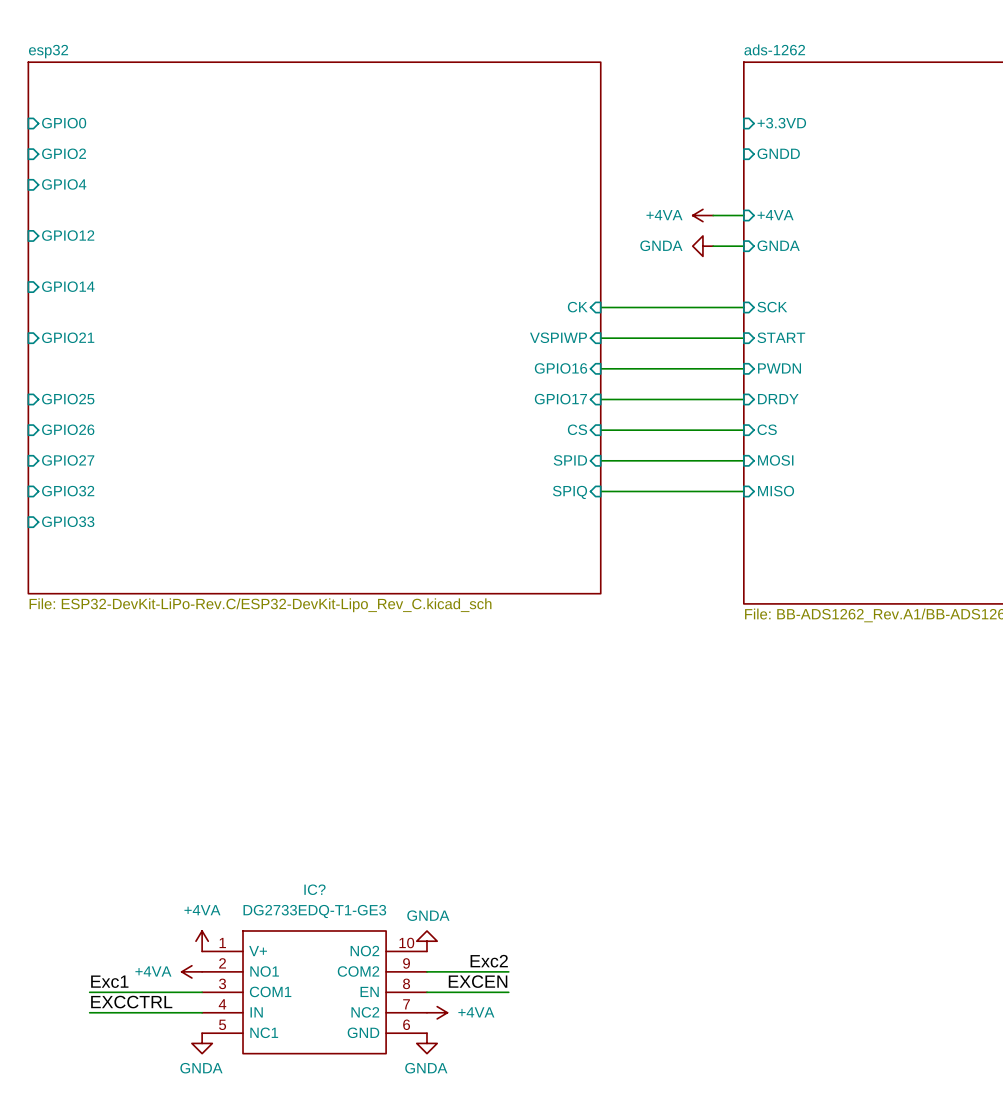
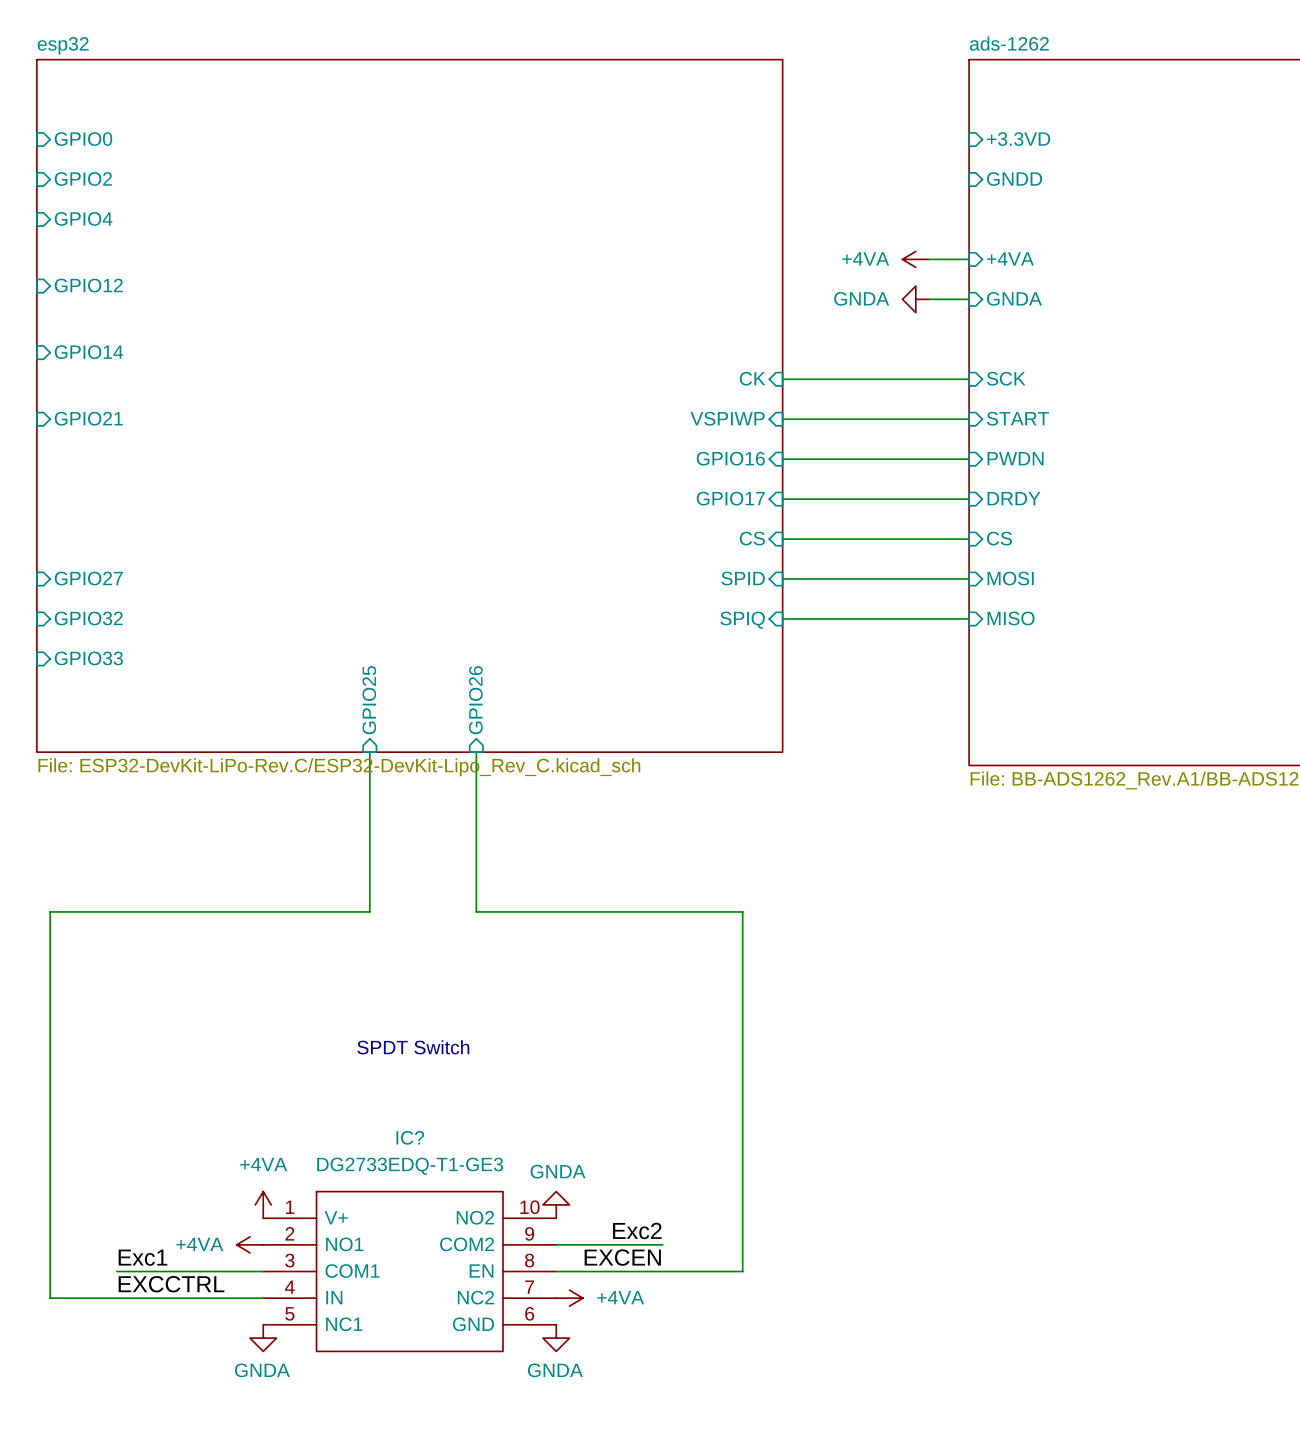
sheet pin: GPIO25 (68, 399) -> none
sheet pin: GPIO26 (68, 429) -> none
sheet pin: none -> GPIO25 (369, 700)
sheet pin: none -> GPIO26 (475, 700)
wire: none -> (369, 752) (369, 911) (50, 911) (50, 1298) (116, 1298)
wire: none -> (476, 752) (476, 911) (742, 911) (742, 1271) (662, 1271)
text: none -> SPDT Switch (413, 1047)

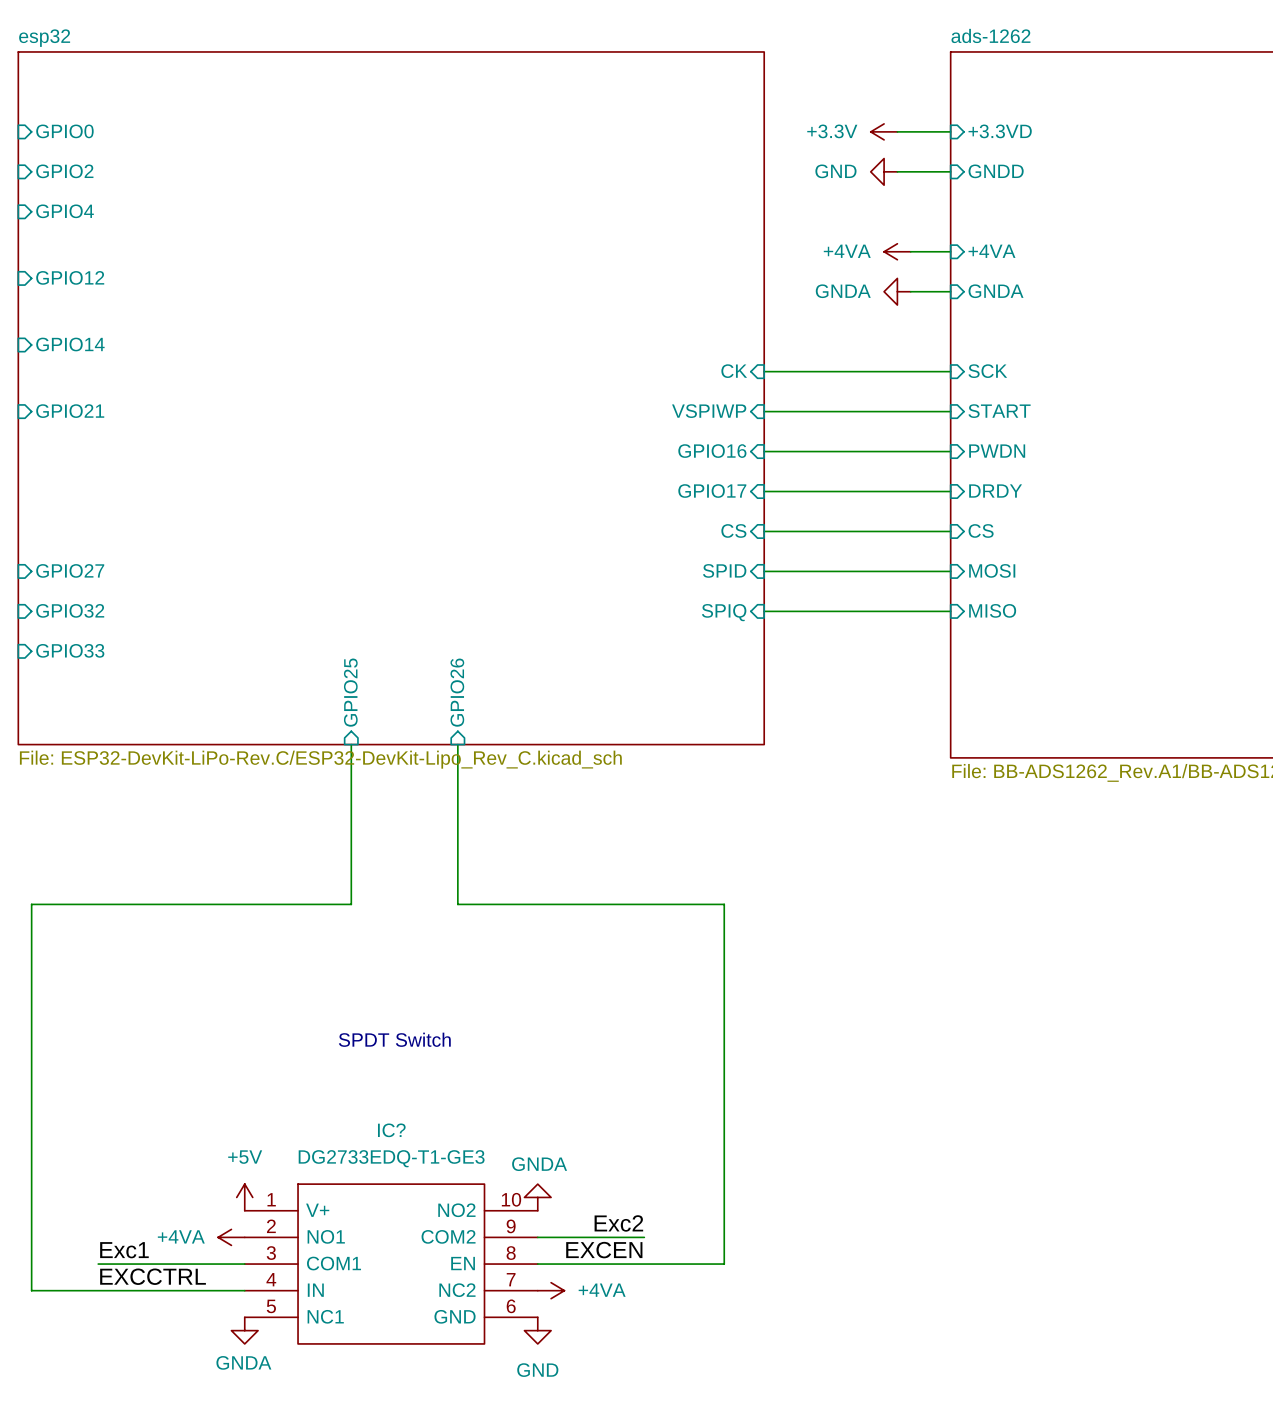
power symbol: none -> +3.3V (884, 131)
wire: none -> (897, 131) (950, 131)
power symbol: none -> GND (884, 171)
wire: none -> (897, 171) (950, 171)
power symbol: +4VA (263, 1204) -> +5V (244, 1197)
power symbol: GNDA (556, 1338) -> GND (537, 1330)

